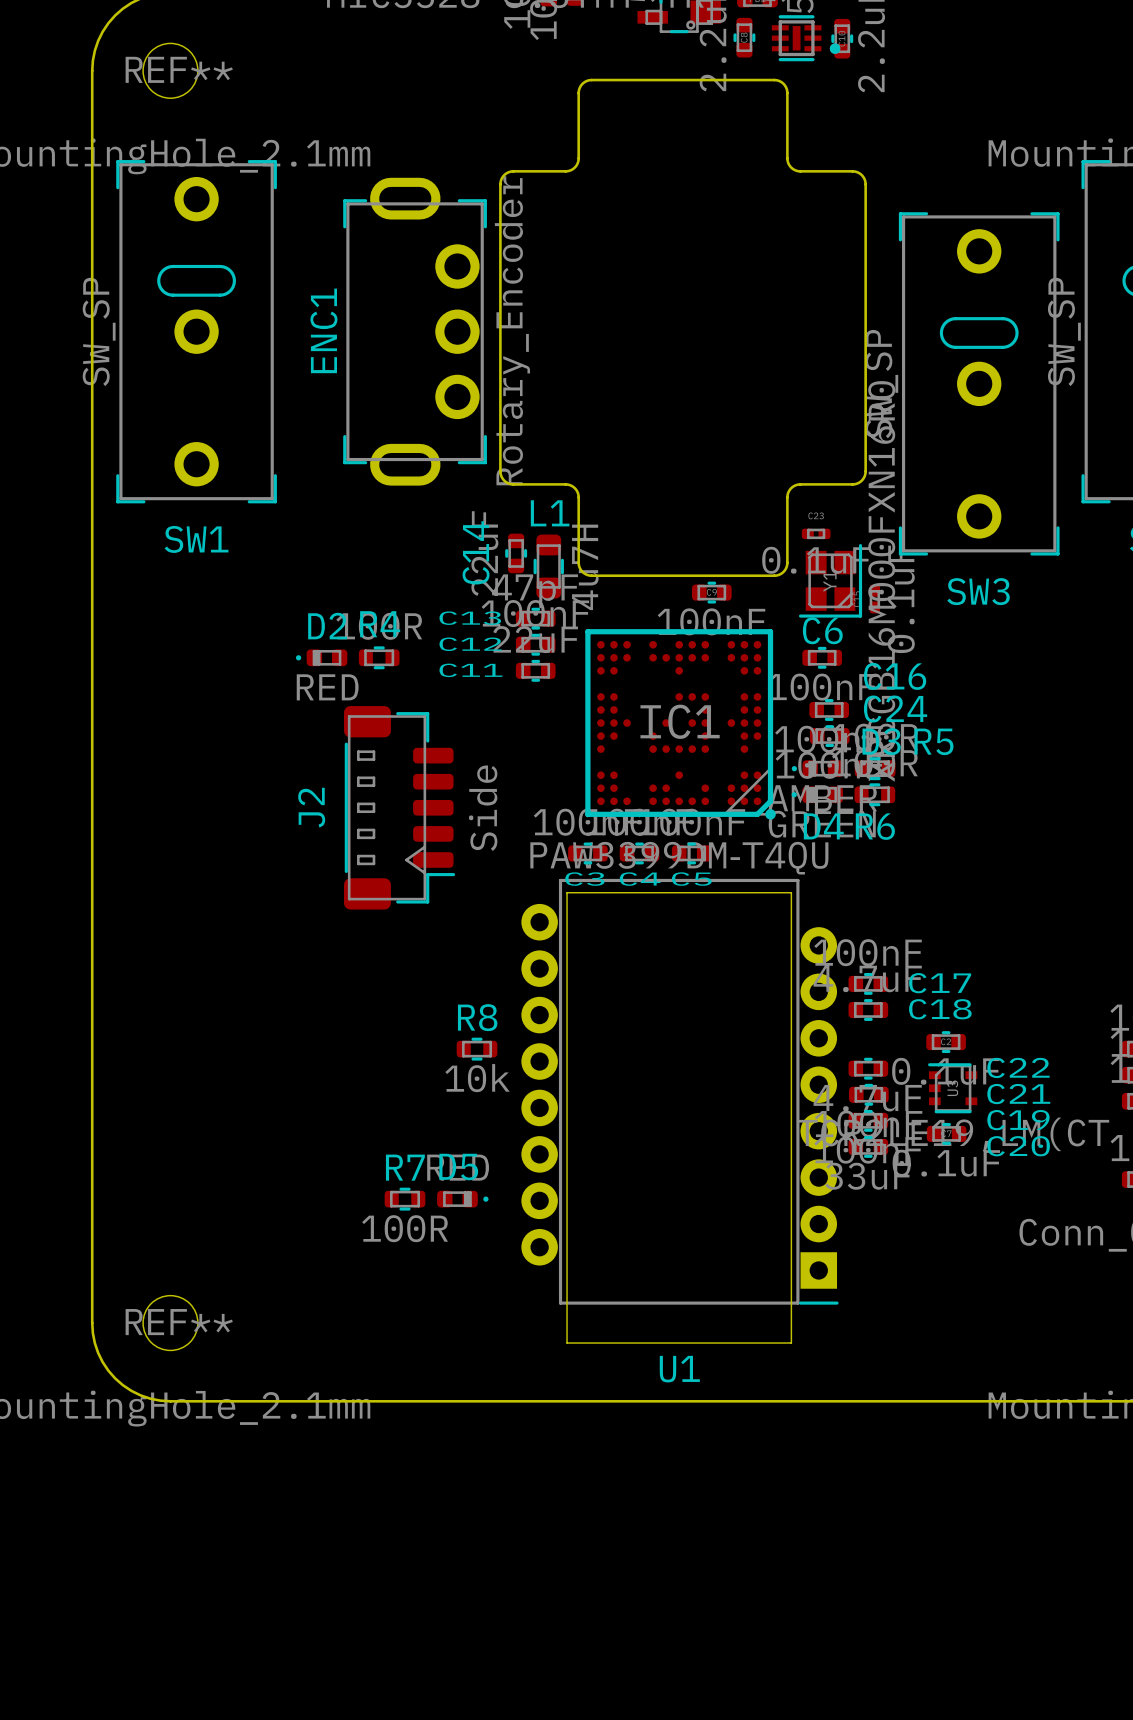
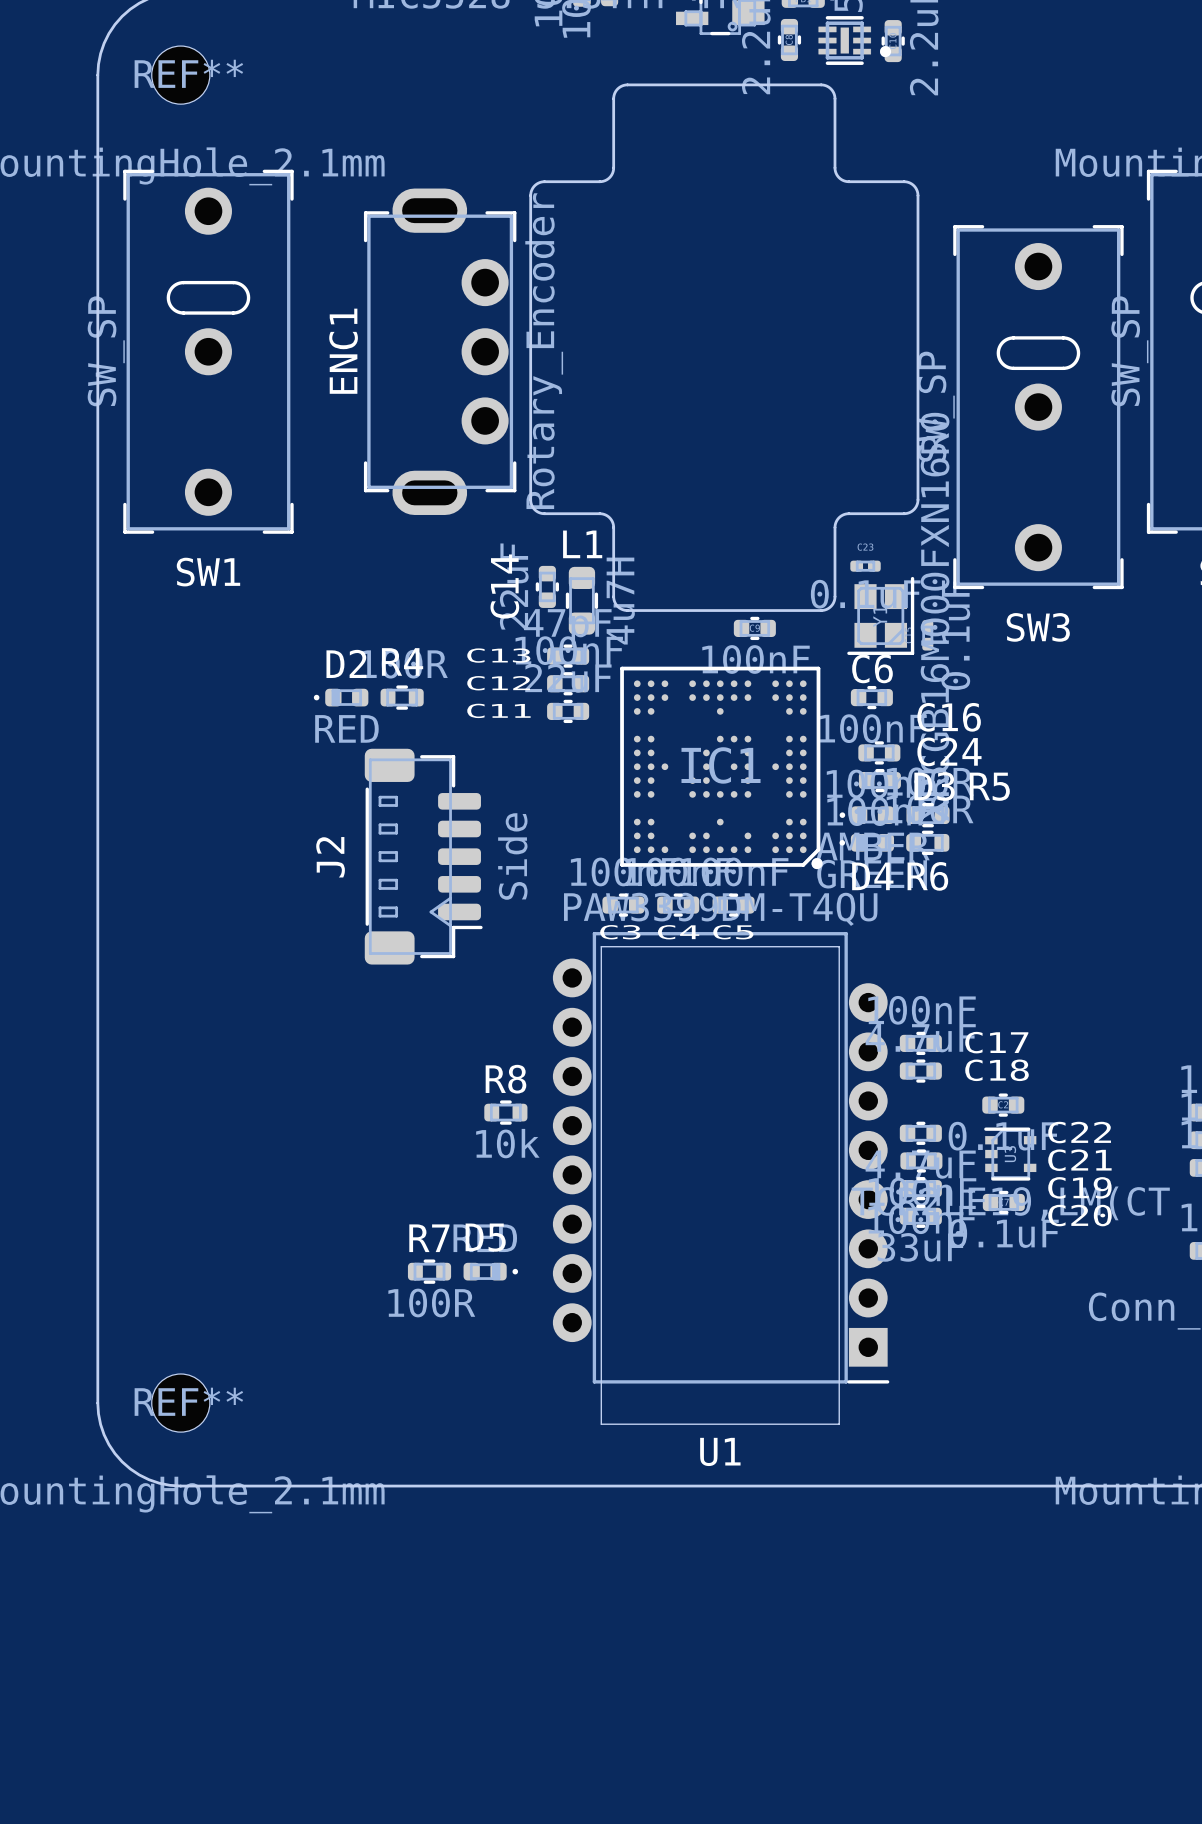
IC1 footprint: [585, 629, 776, 820] -> [620, 666, 823, 870]

